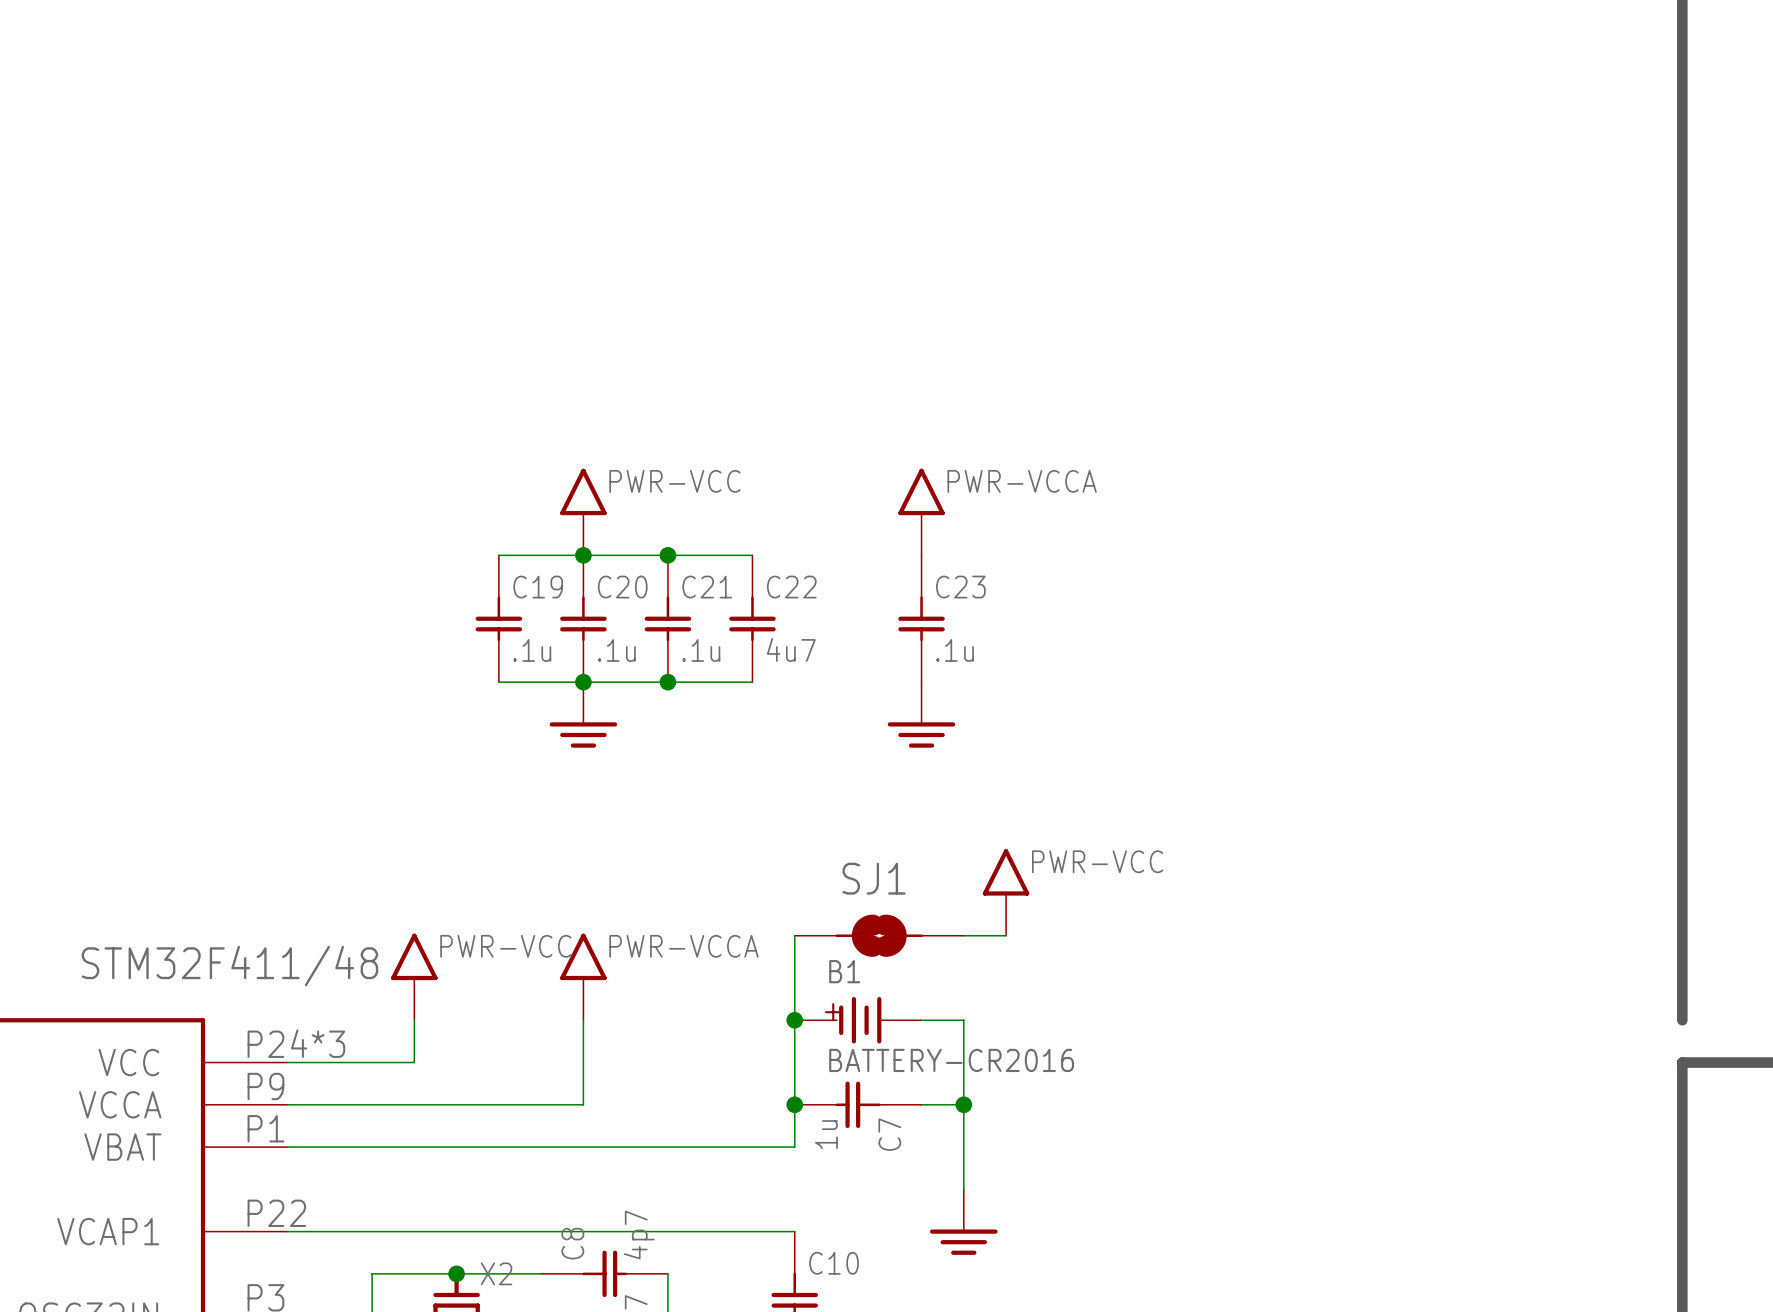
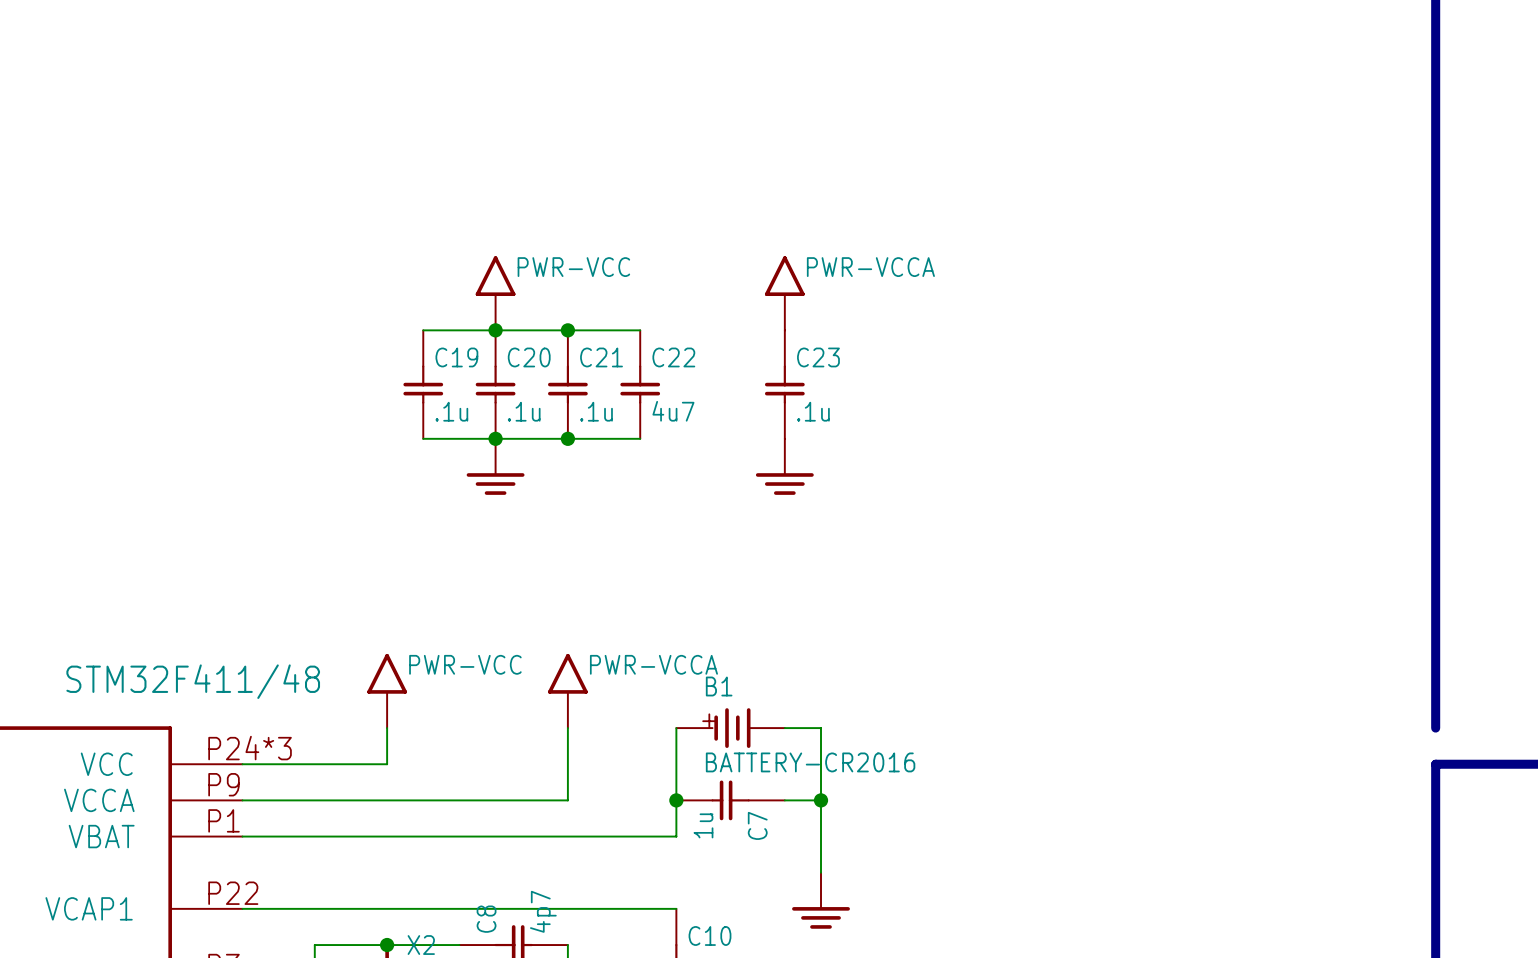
power symbol: PWR-VCC (1006, 892) -> none
wire: (794, 935) (794, 1020) -> none
SJ1: (879, 935) -> none
wire: (963, 935) (1006, 935) -> none
power symbol position: PWR-VCC (414, 976) -> PWR-VCC (387, 691)
power symbol position: PWR-VCCA (583, 976) -> PWR-VCCA (567, 691)
wire: (414, 1020) (414, 1062) -> (387, 728) (387, 764) (350, 764)
wire: (583, 1020) (583, 1104) -> (567, 728) (567, 800) (495, 800)
junction: (794, 1020) -> none

